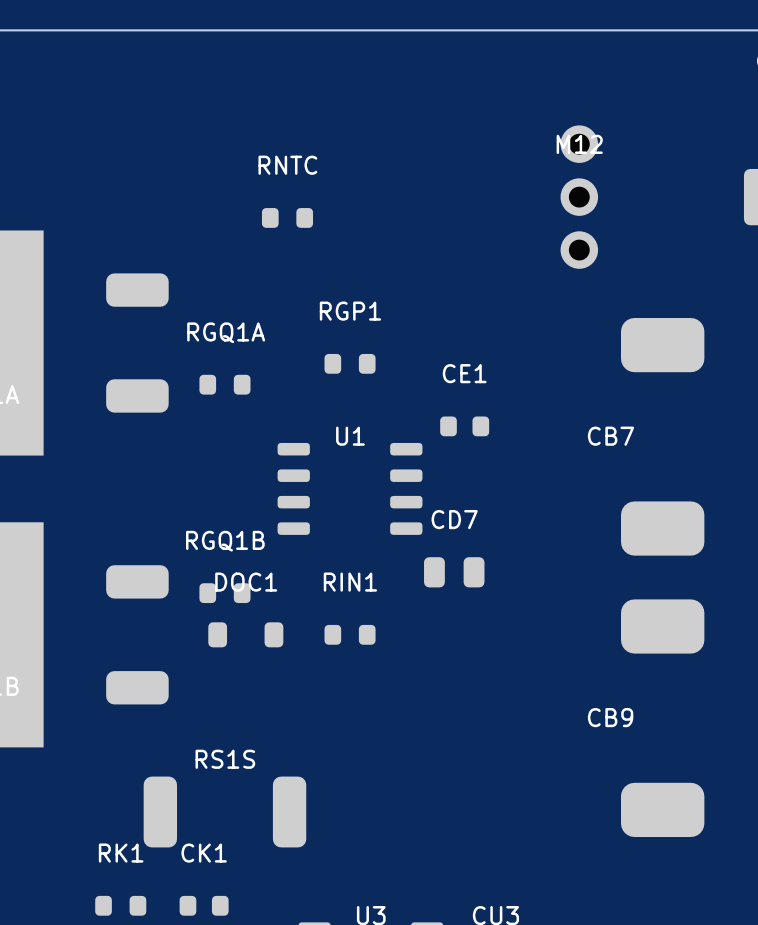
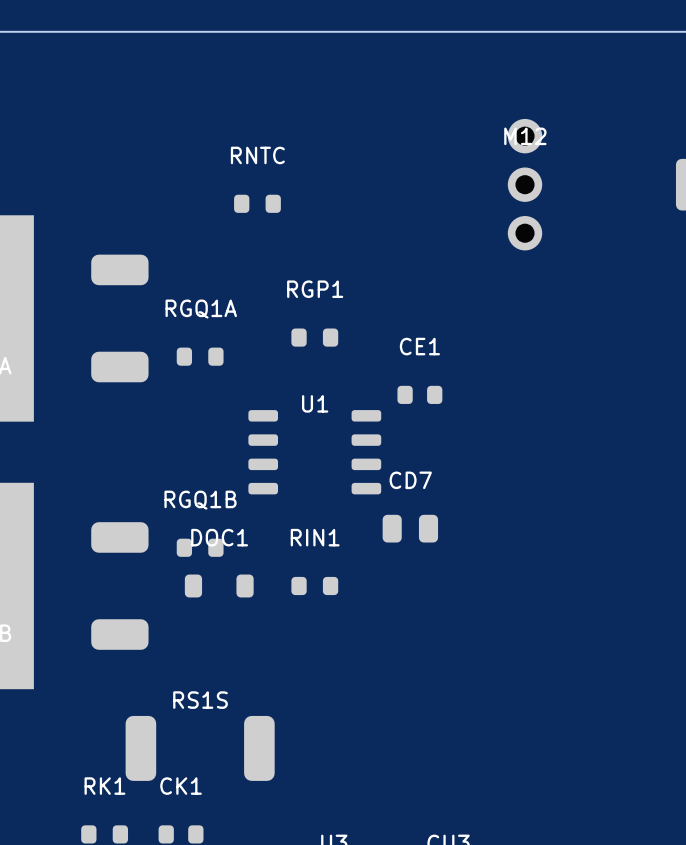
CB7: (662, 436) -> none
CB9: (662, 718) -> none

